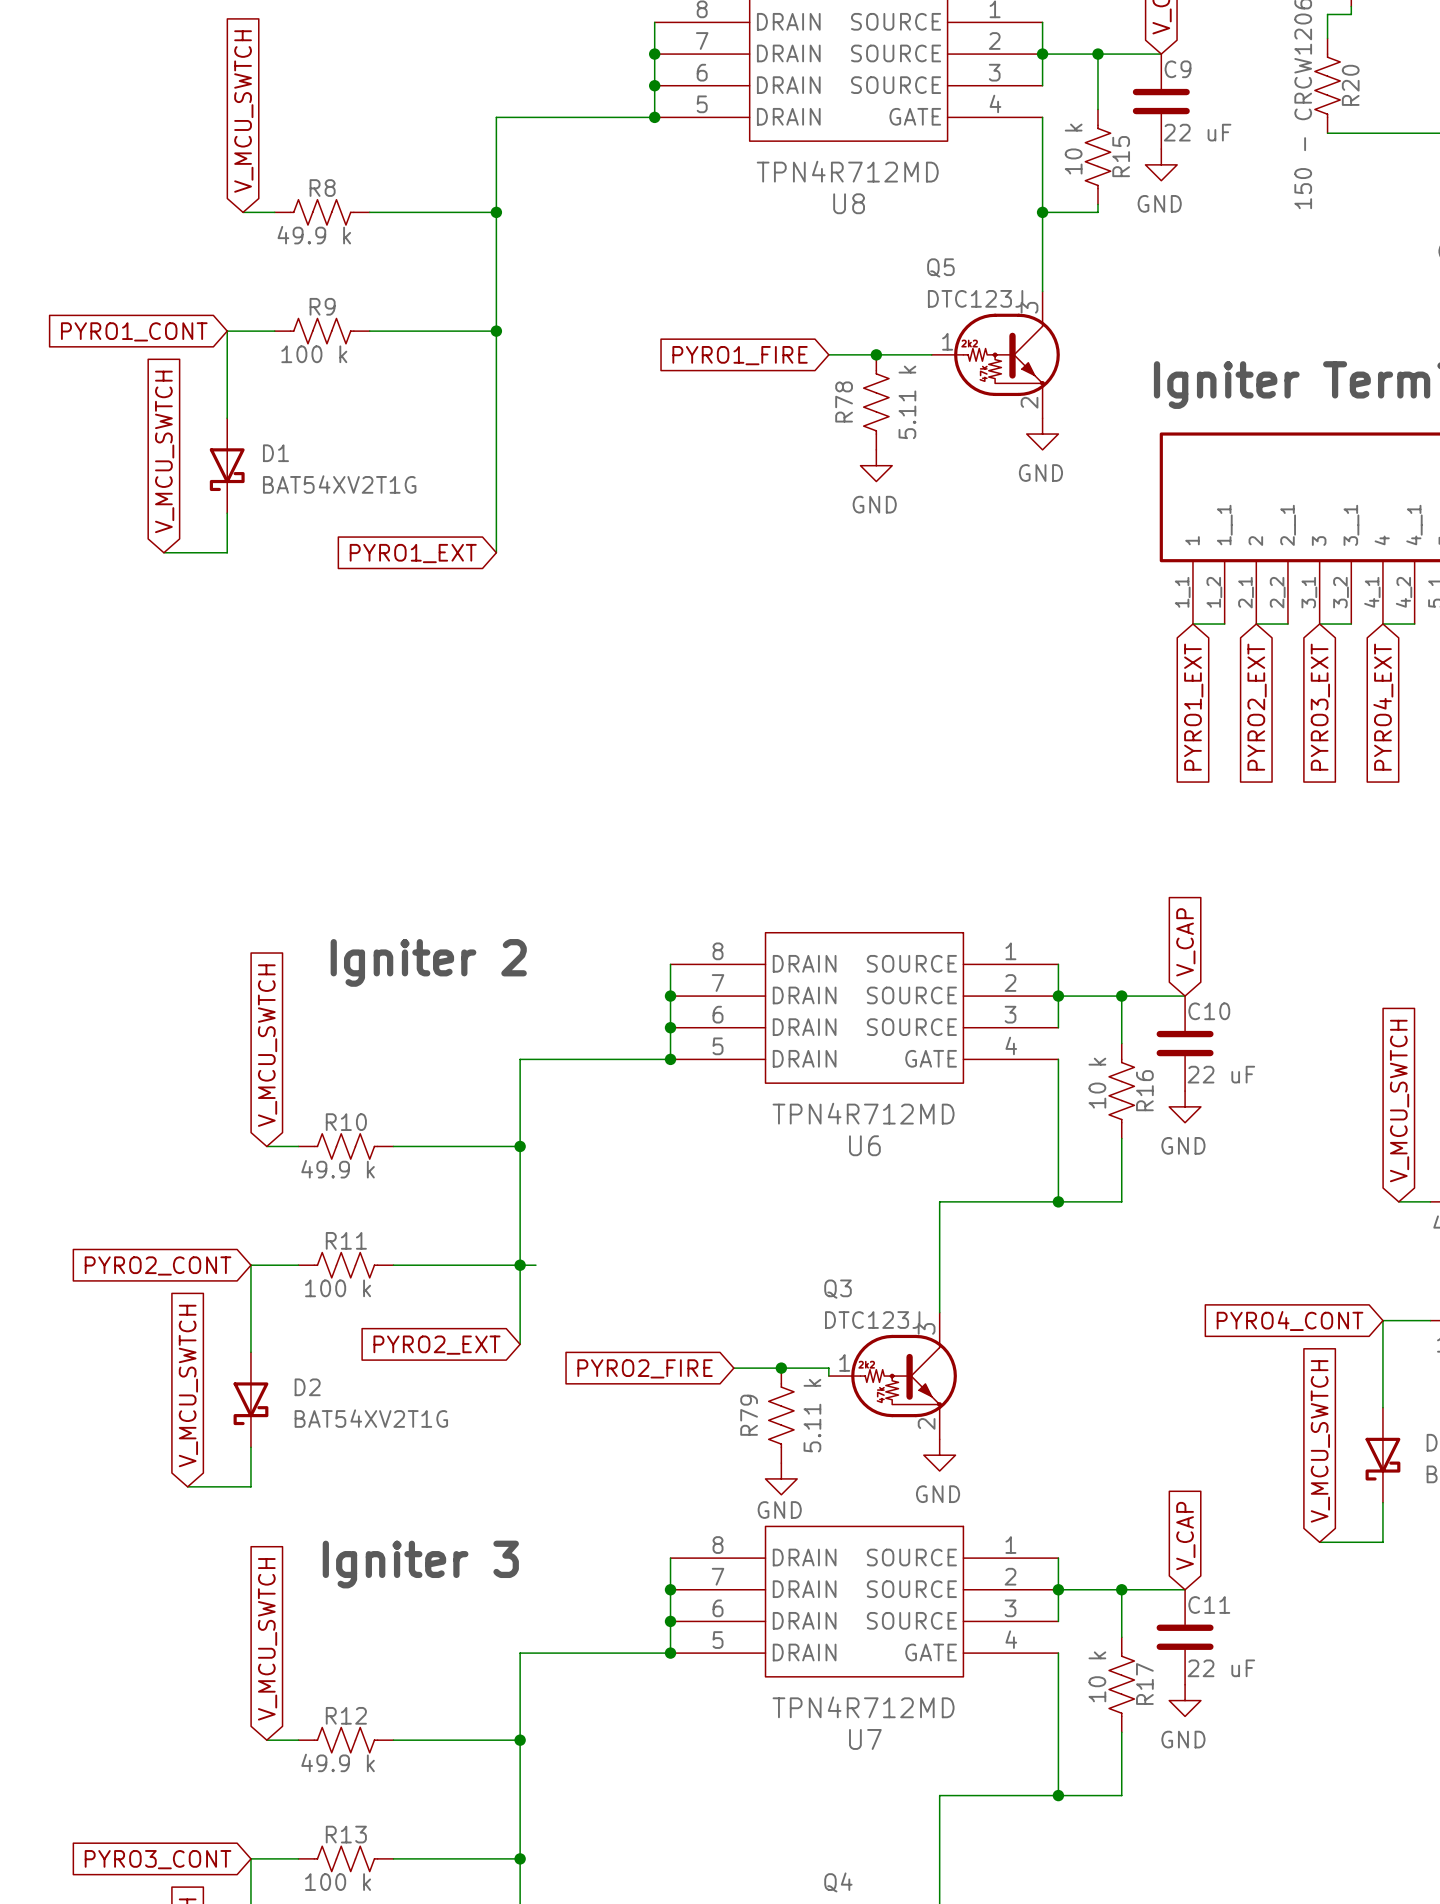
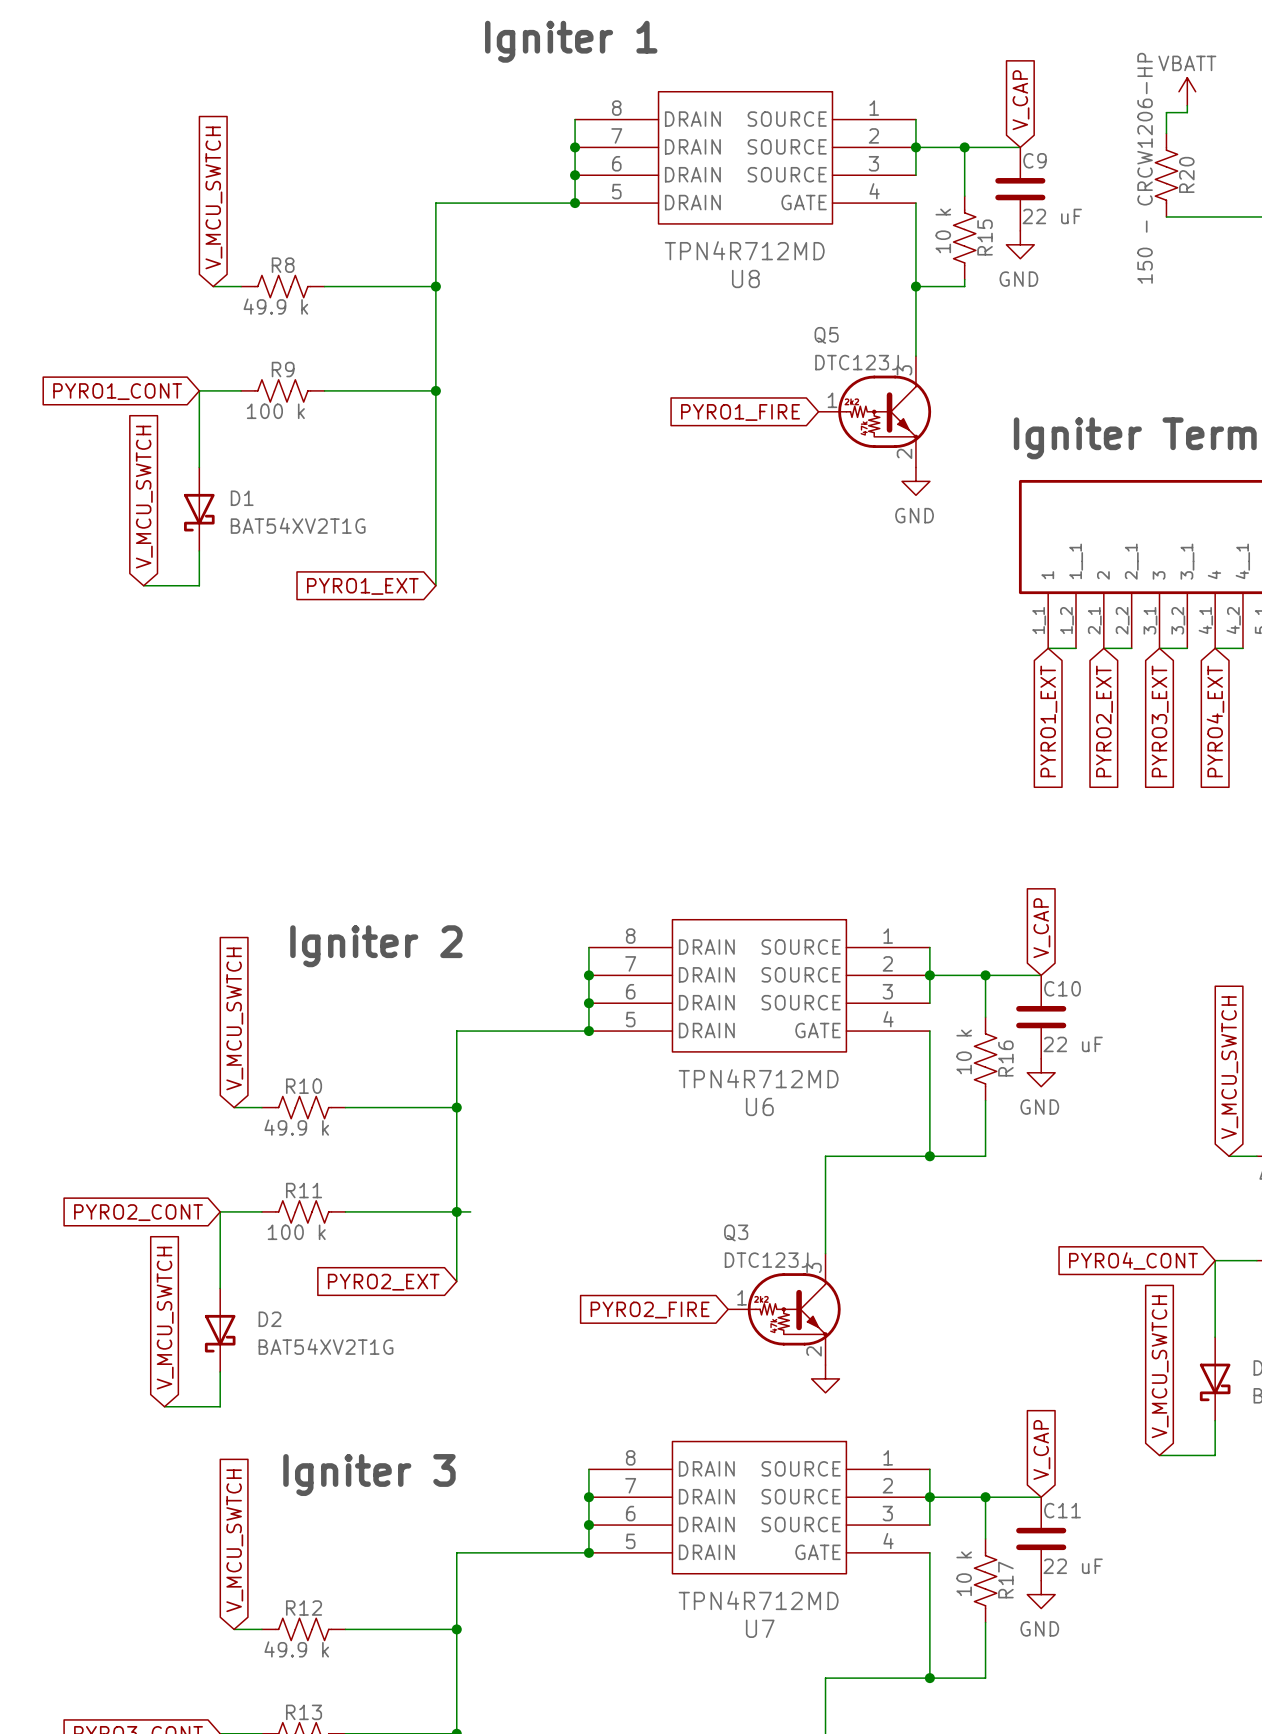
wire: (828, 354) (931, 354) -> none
junction: (876, 354) -> none
global label position: PYRO1_FIRE (740, 355) -> PYRO1_FIRE (740, 412)
R78: 5.11 k (876, 402) -> none
power symbol: GND (876, 465) -> none
global label position: PYRO2_FIRE (645, 1368) -> PYRO2_FIRE (650, 1310)
wire: (733, 1368) (828, 1368) (828, 1376) -> none
junction: (781, 1368) -> none
R79: 5.11 k (781, 1415) -> none
power symbol: GND (781, 1478) -> none
power symbol text: GND (938, 1494) -> none

